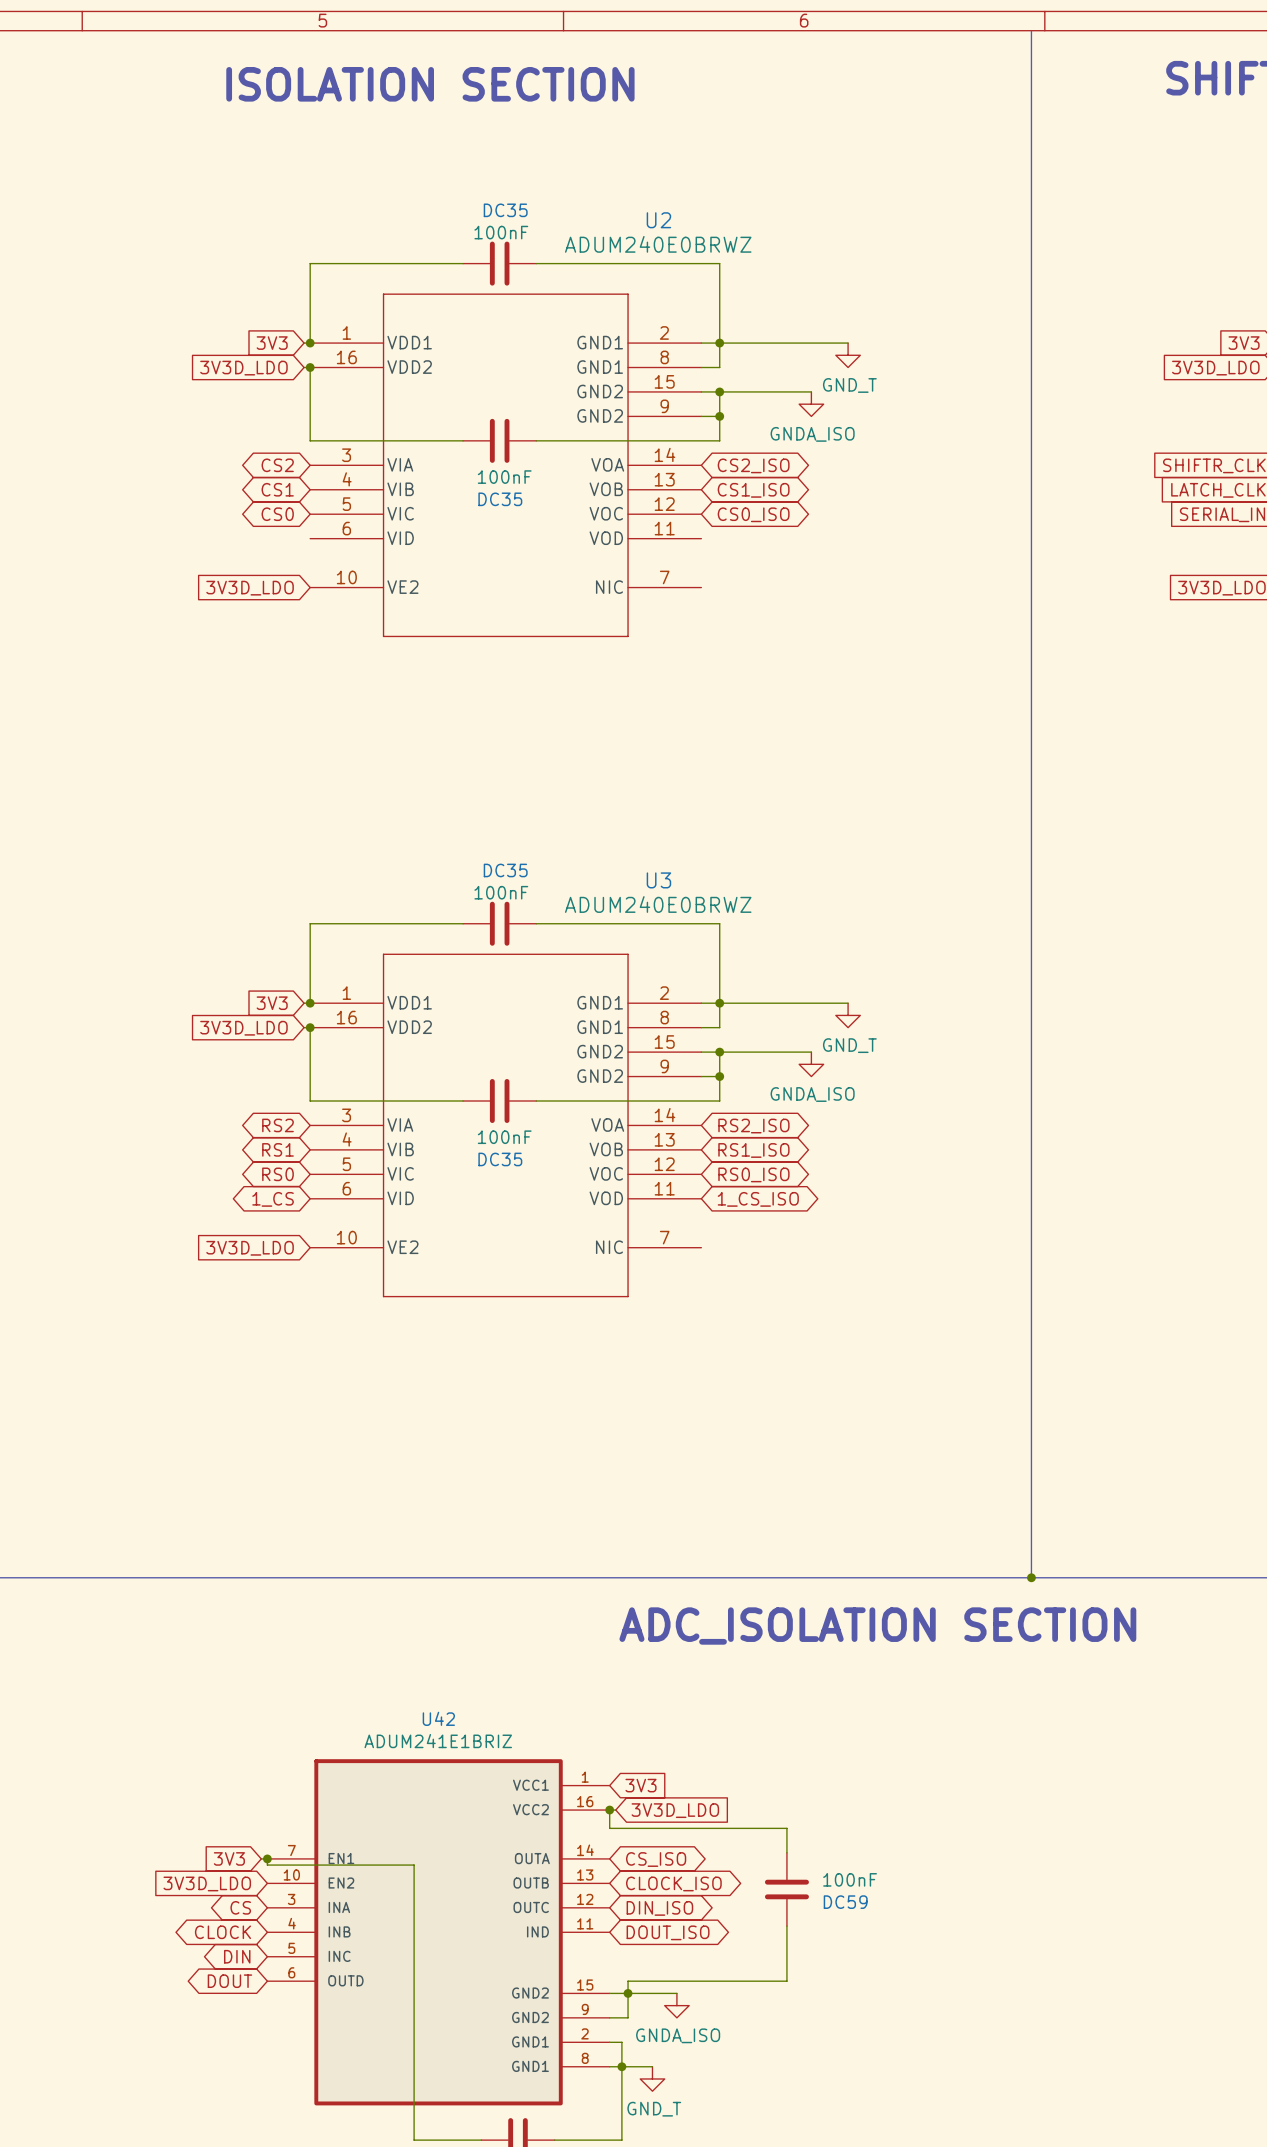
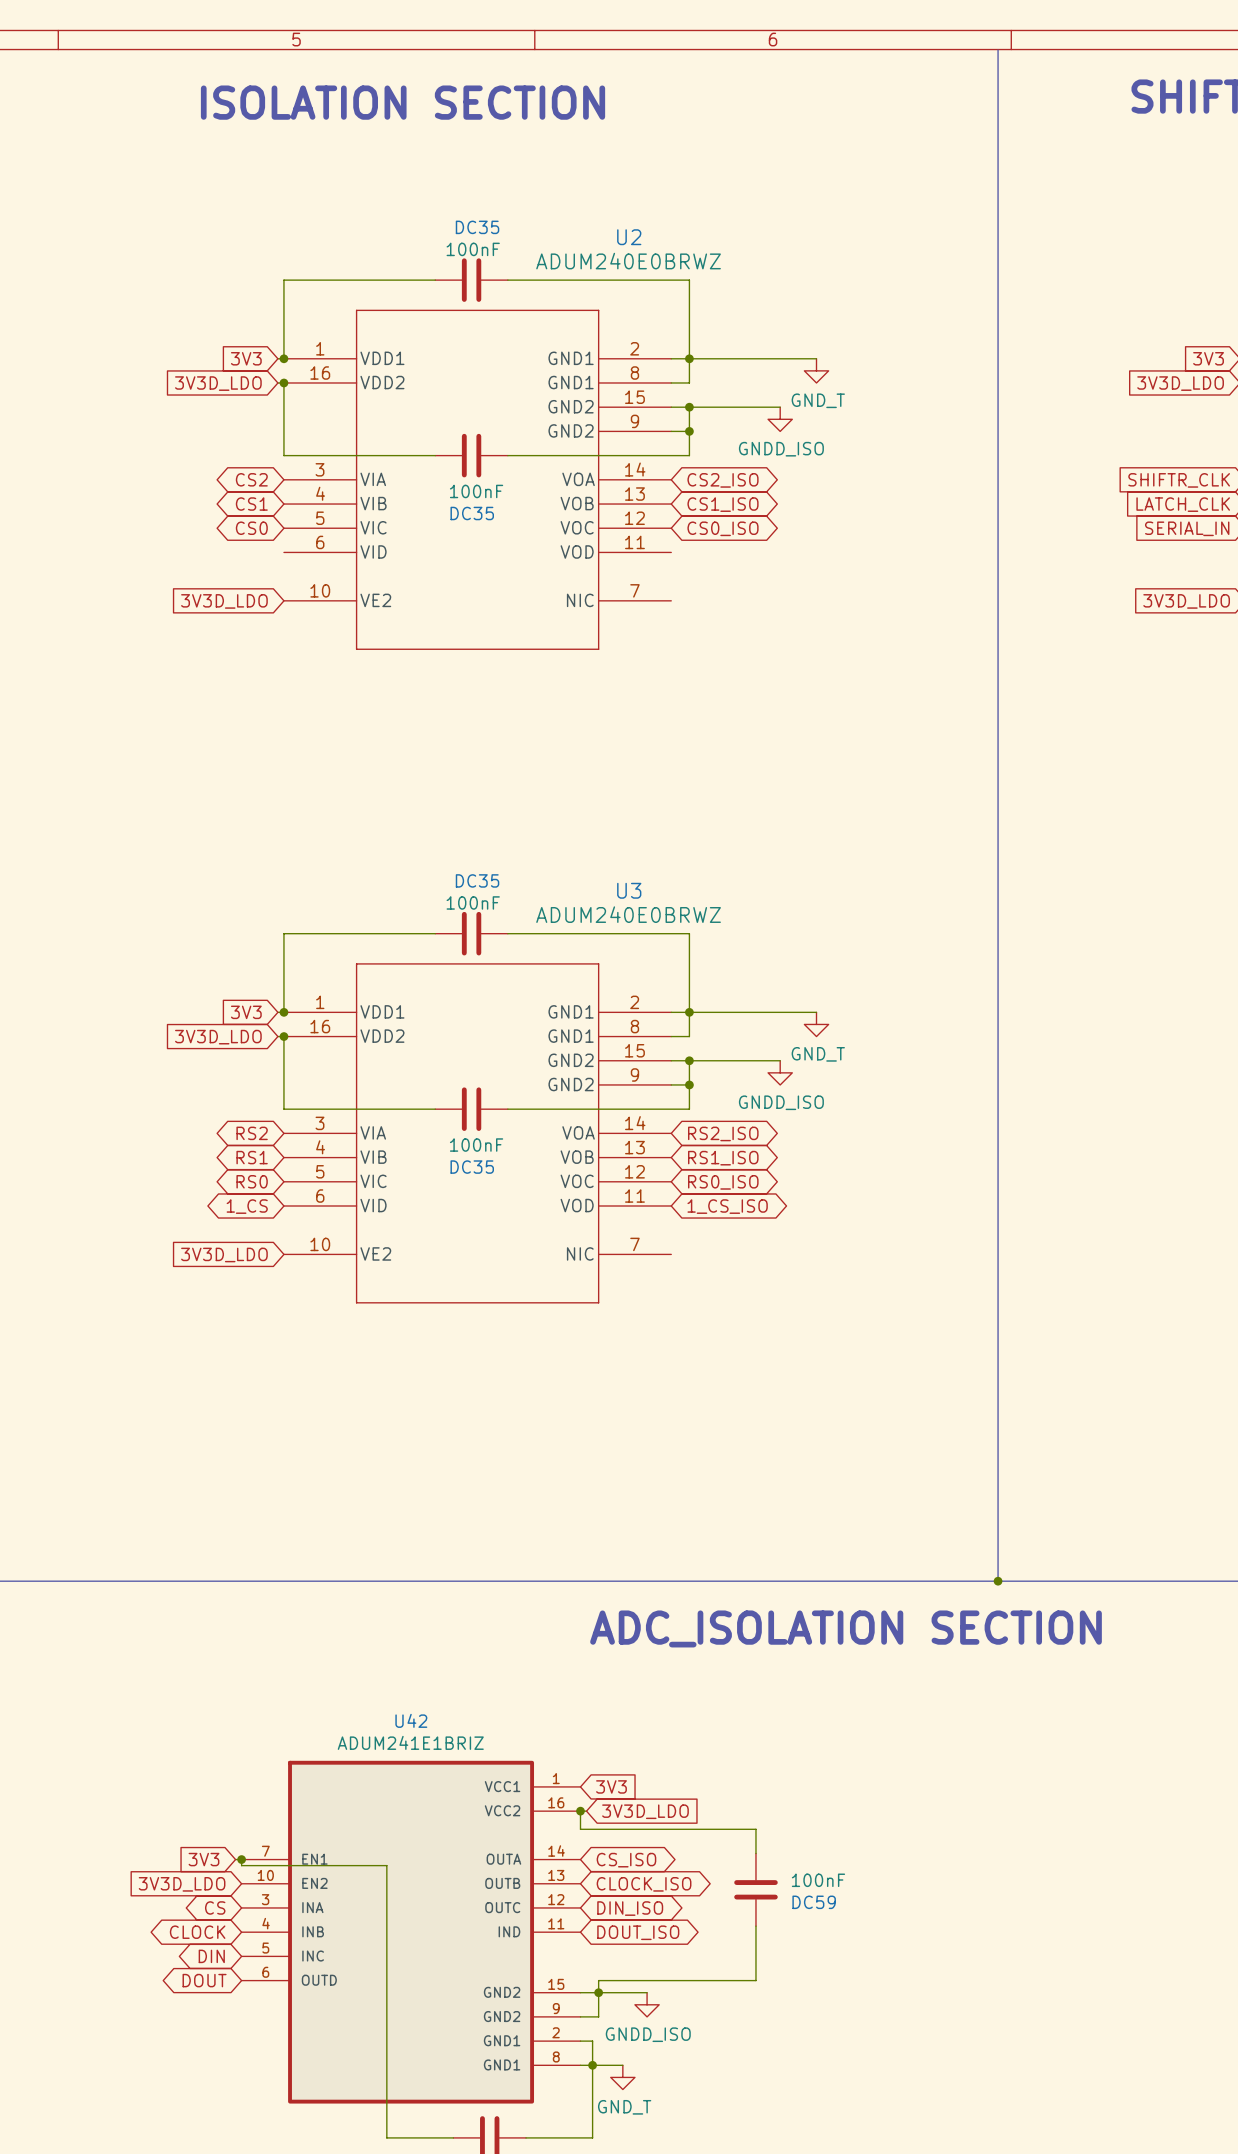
power symbol: GNDA_ISO (811, 404) -> GNDD_ISO (780, 419)
power symbol: GNDA_ISO (811, 1064) -> GNDD_ISO (780, 1072)
power symbol: GNDA_ISO (676, 2005) -> GNDD_ISO (647, 2004)

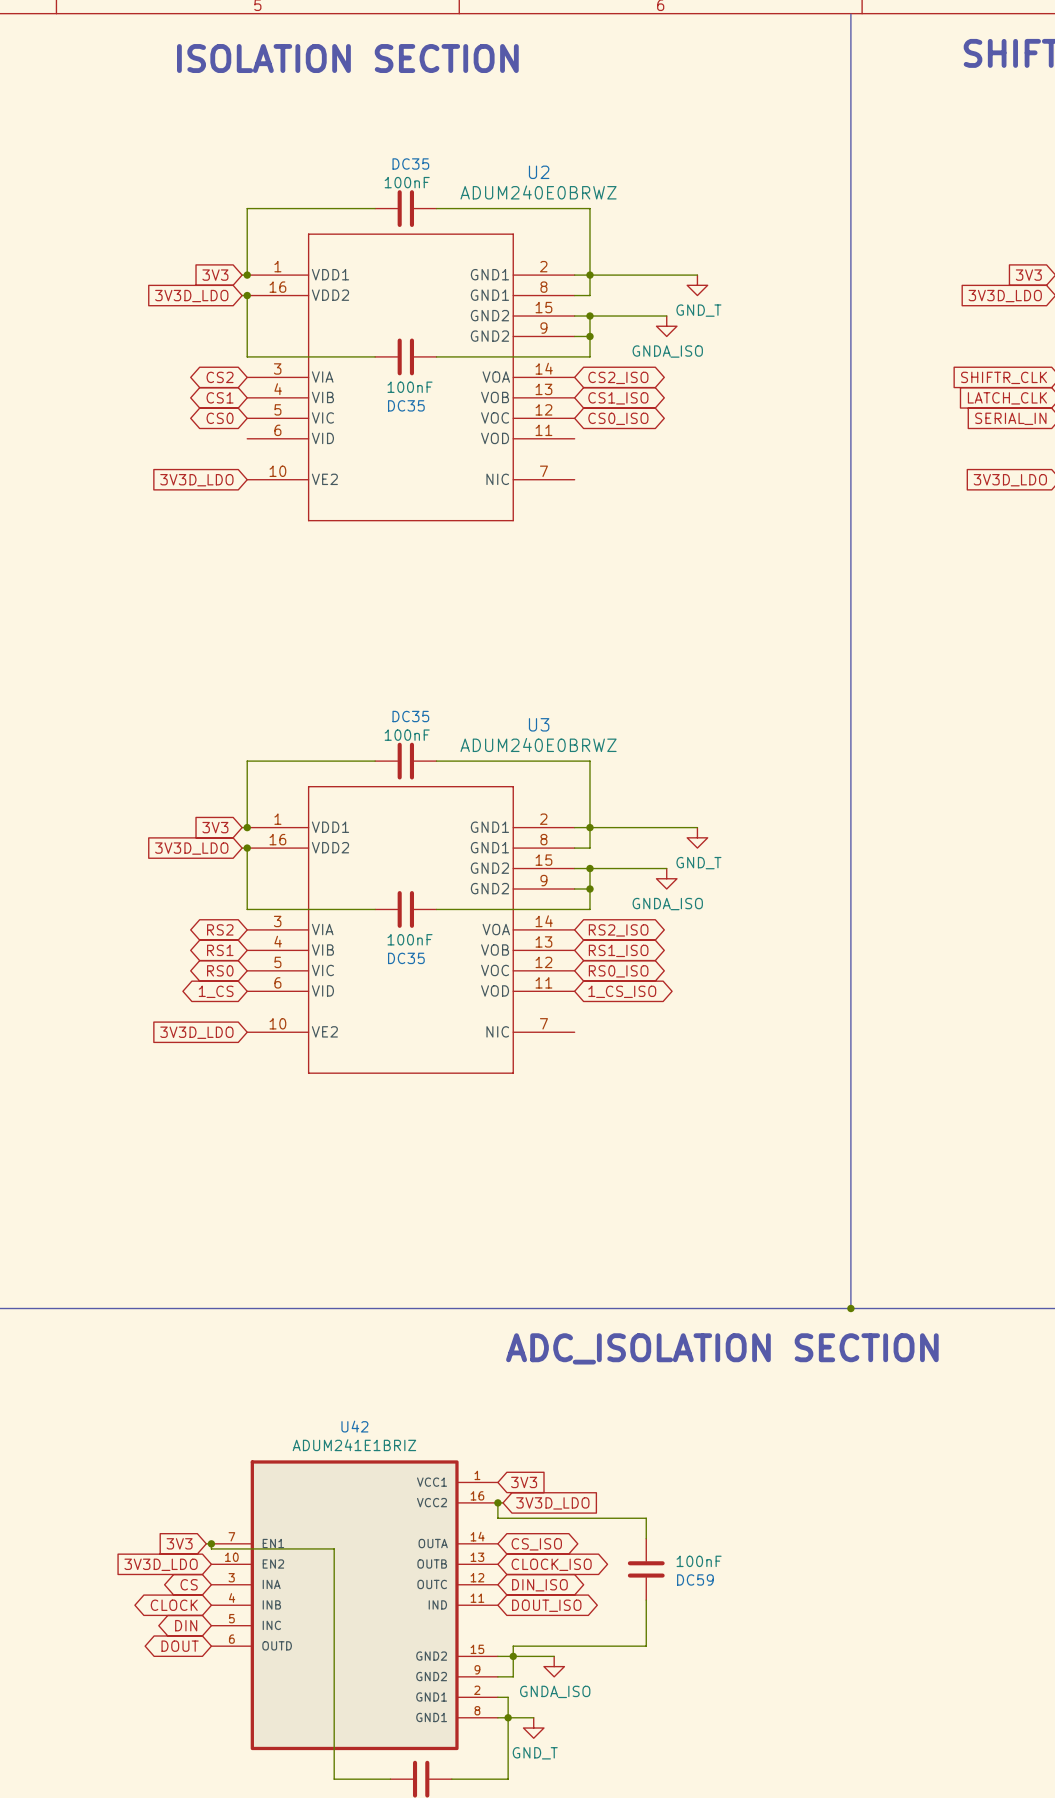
power symbol: GNDD_ISO (780, 419) -> GNDA_ISO (666, 326)
power symbol: GNDD_ISO (780, 1072) -> GNDA_ISO (666, 878)
power symbol: GNDD_ISO (647, 2004) -> GNDA_ISO (554, 1666)

